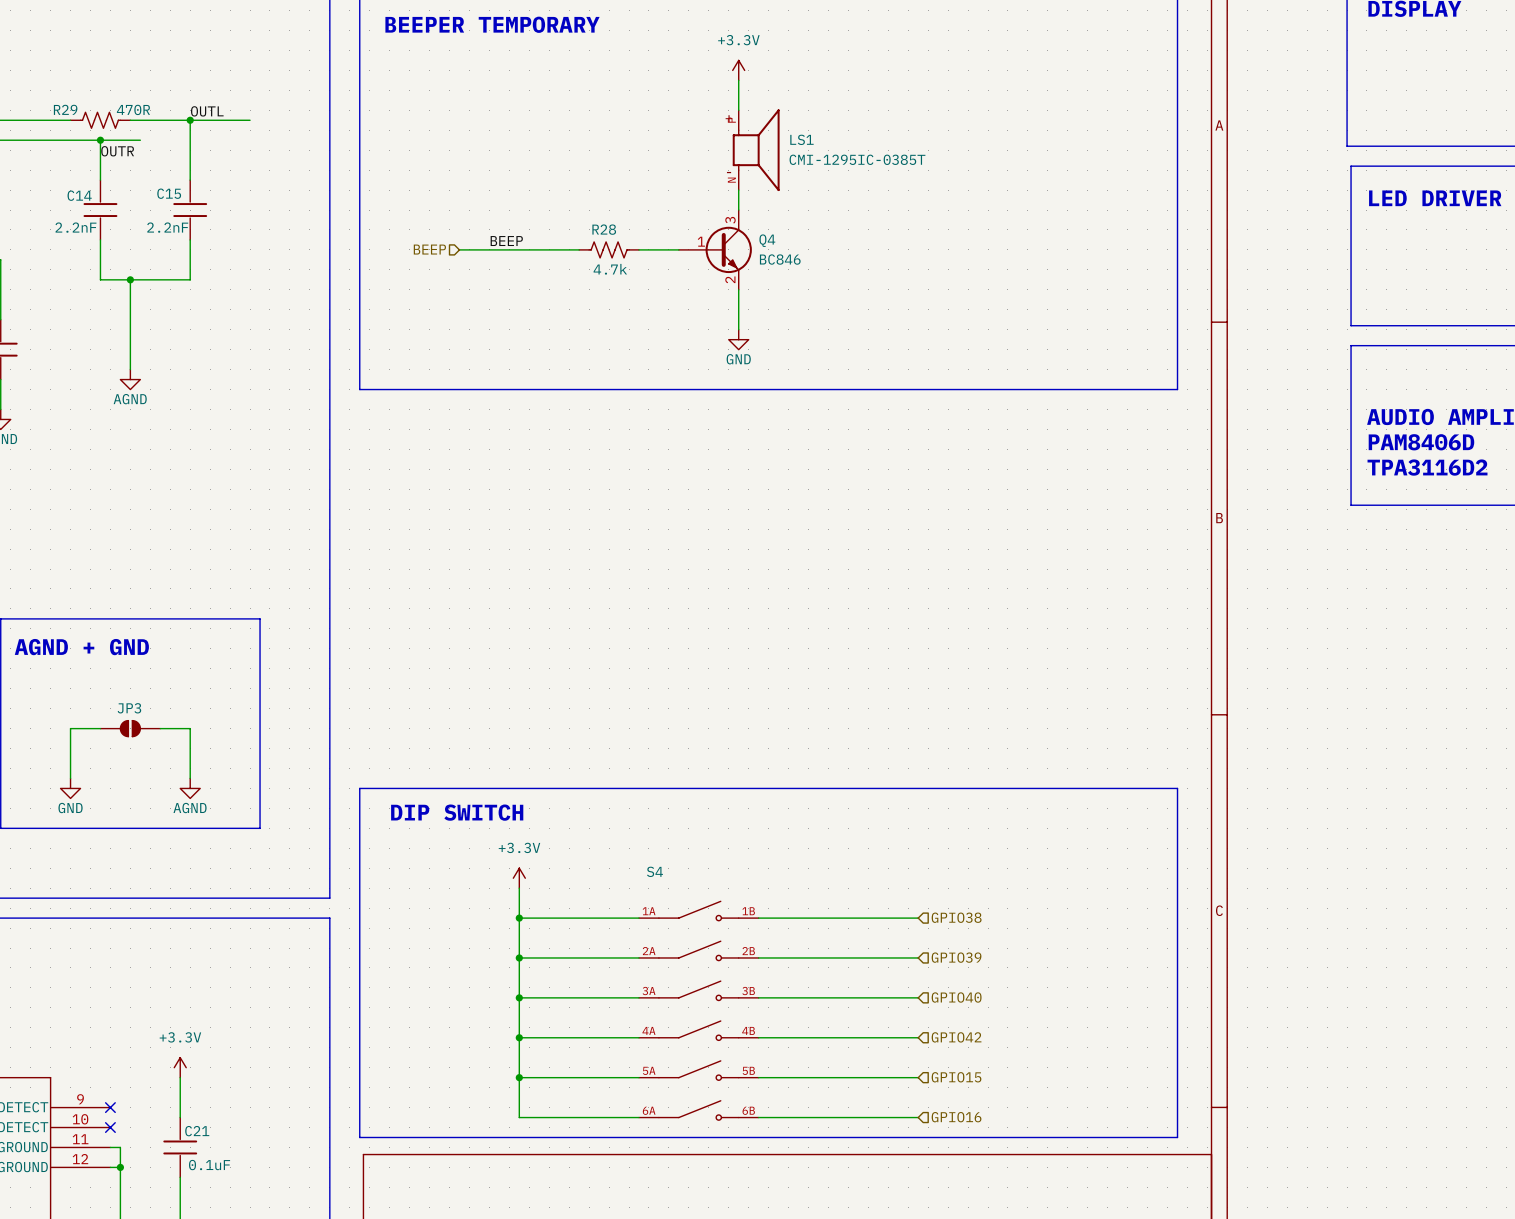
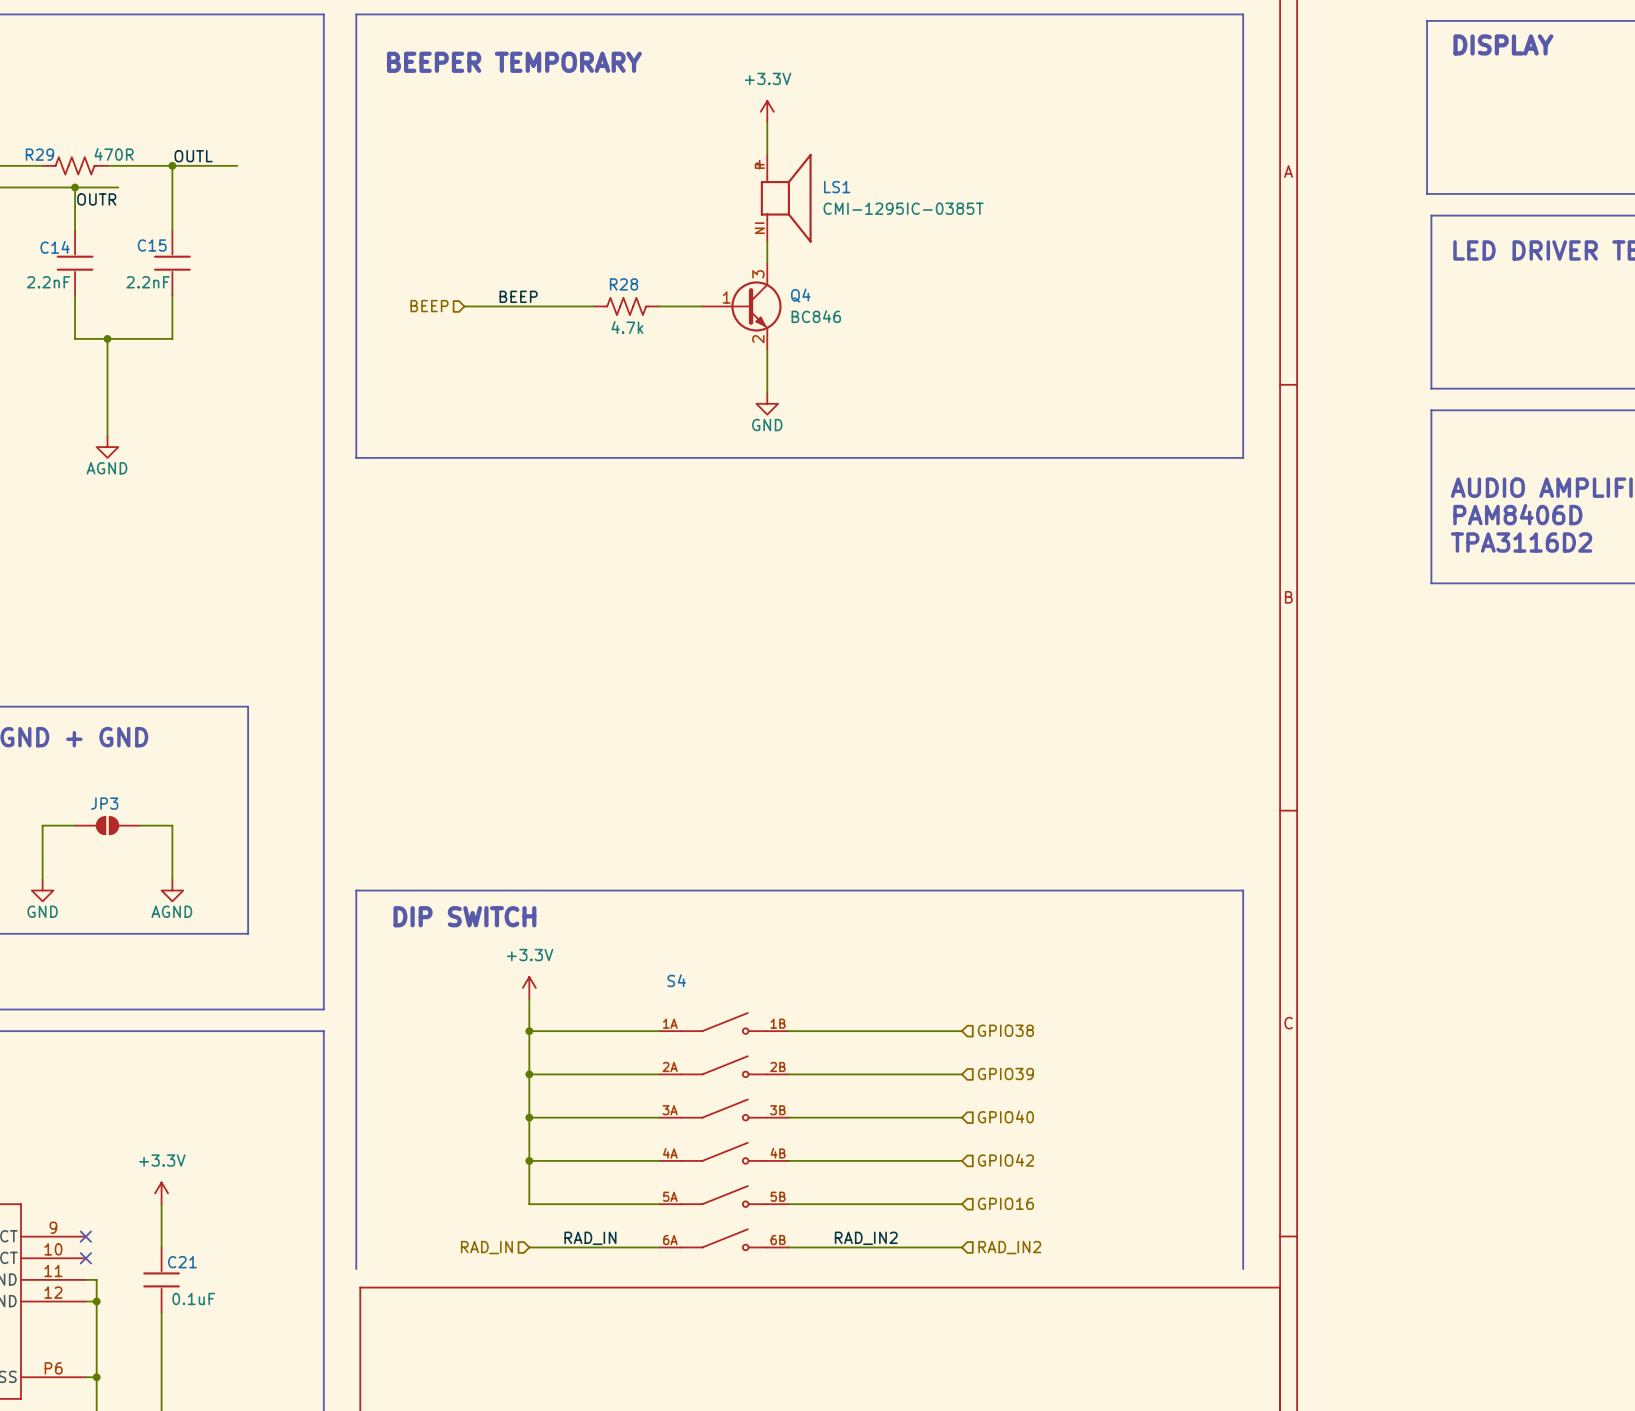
wire: (519, 1077) (519, 1117) -> none
junction: (519, 1077) -> none
hierarchical label: GPIO15 (956, 1077) -> GPIO16 (1005, 1203)
label: none -> RAD_IN (590, 1238)
label: none -> RAD_IN2 (866, 1238)
hierarchical label: GPIO16 (956, 1117) -> RAD_IN2 (1009, 1247)
hierarchical label: none -> RAD_IN (486, 1247)
line: (359, 1137) (1177, 1137) -> none

